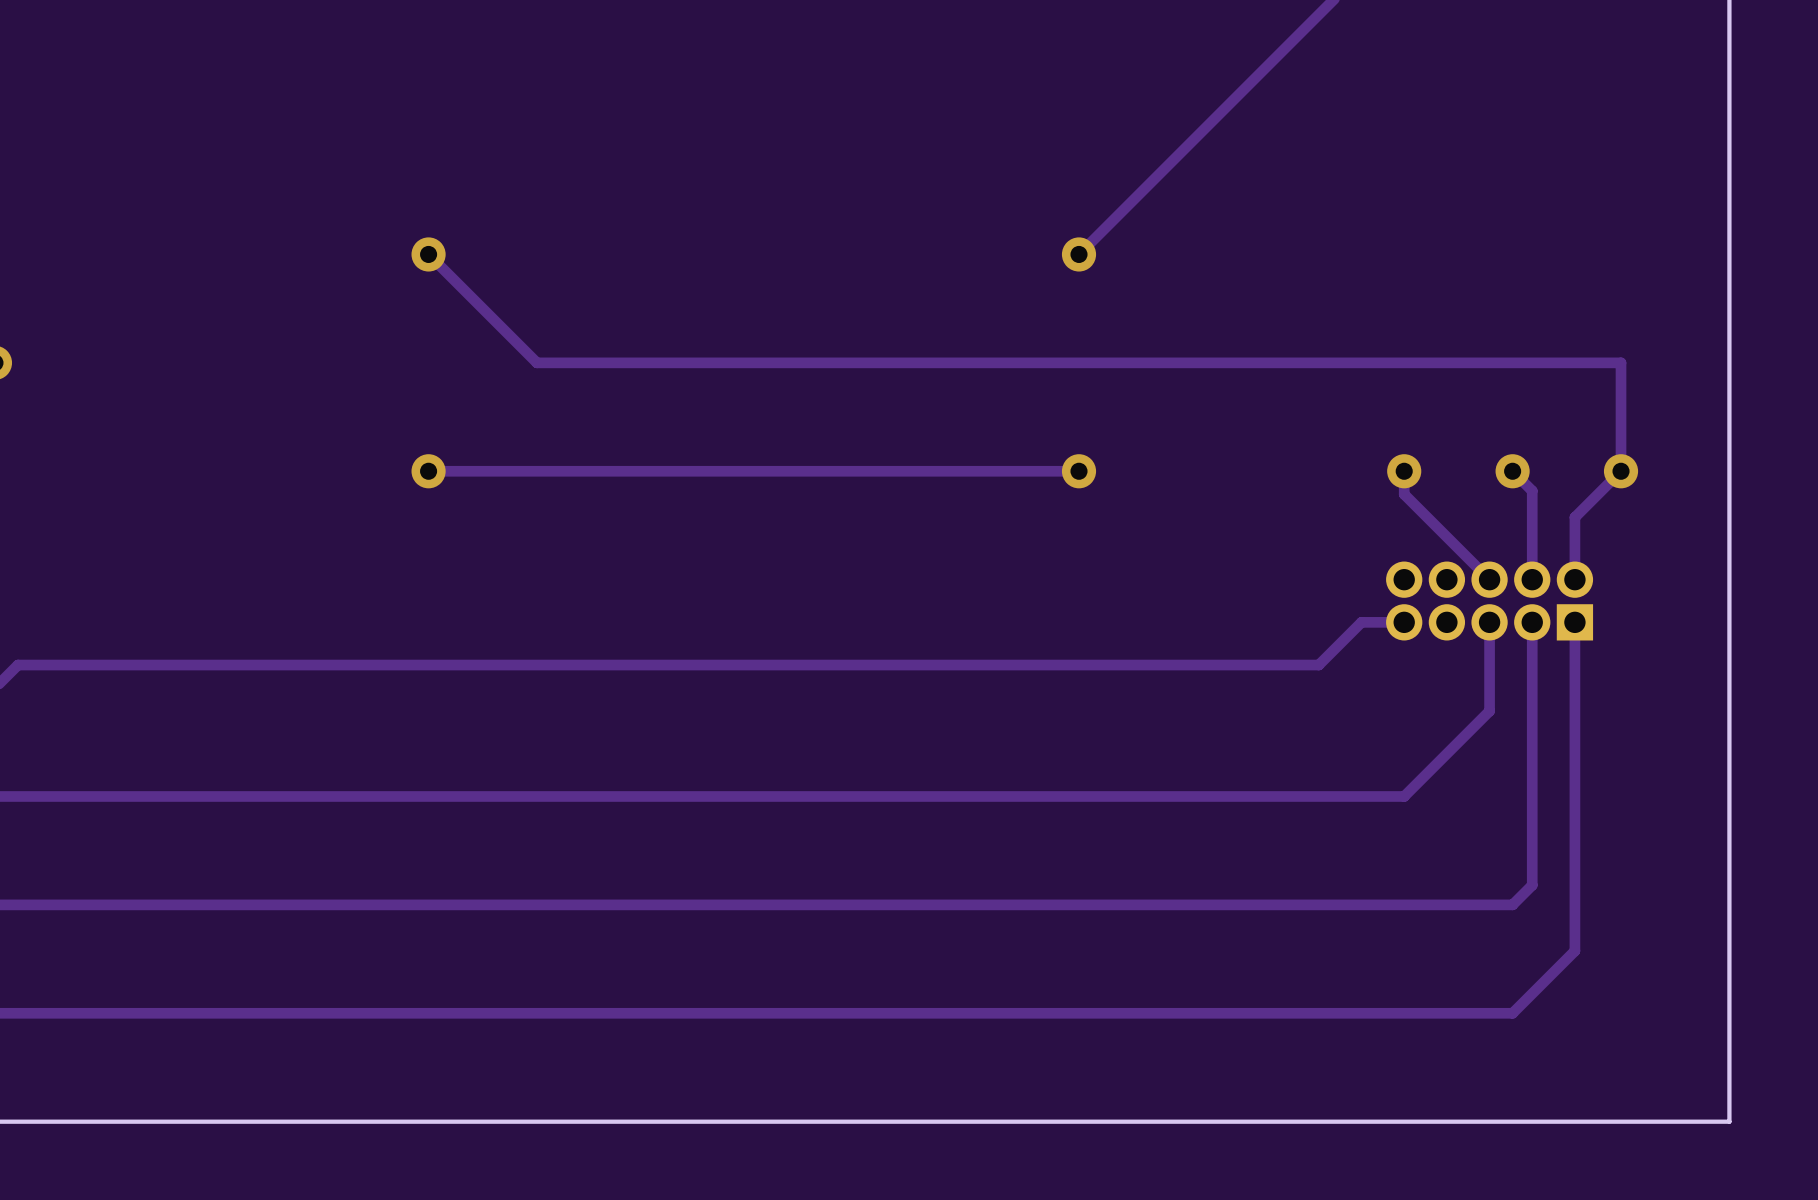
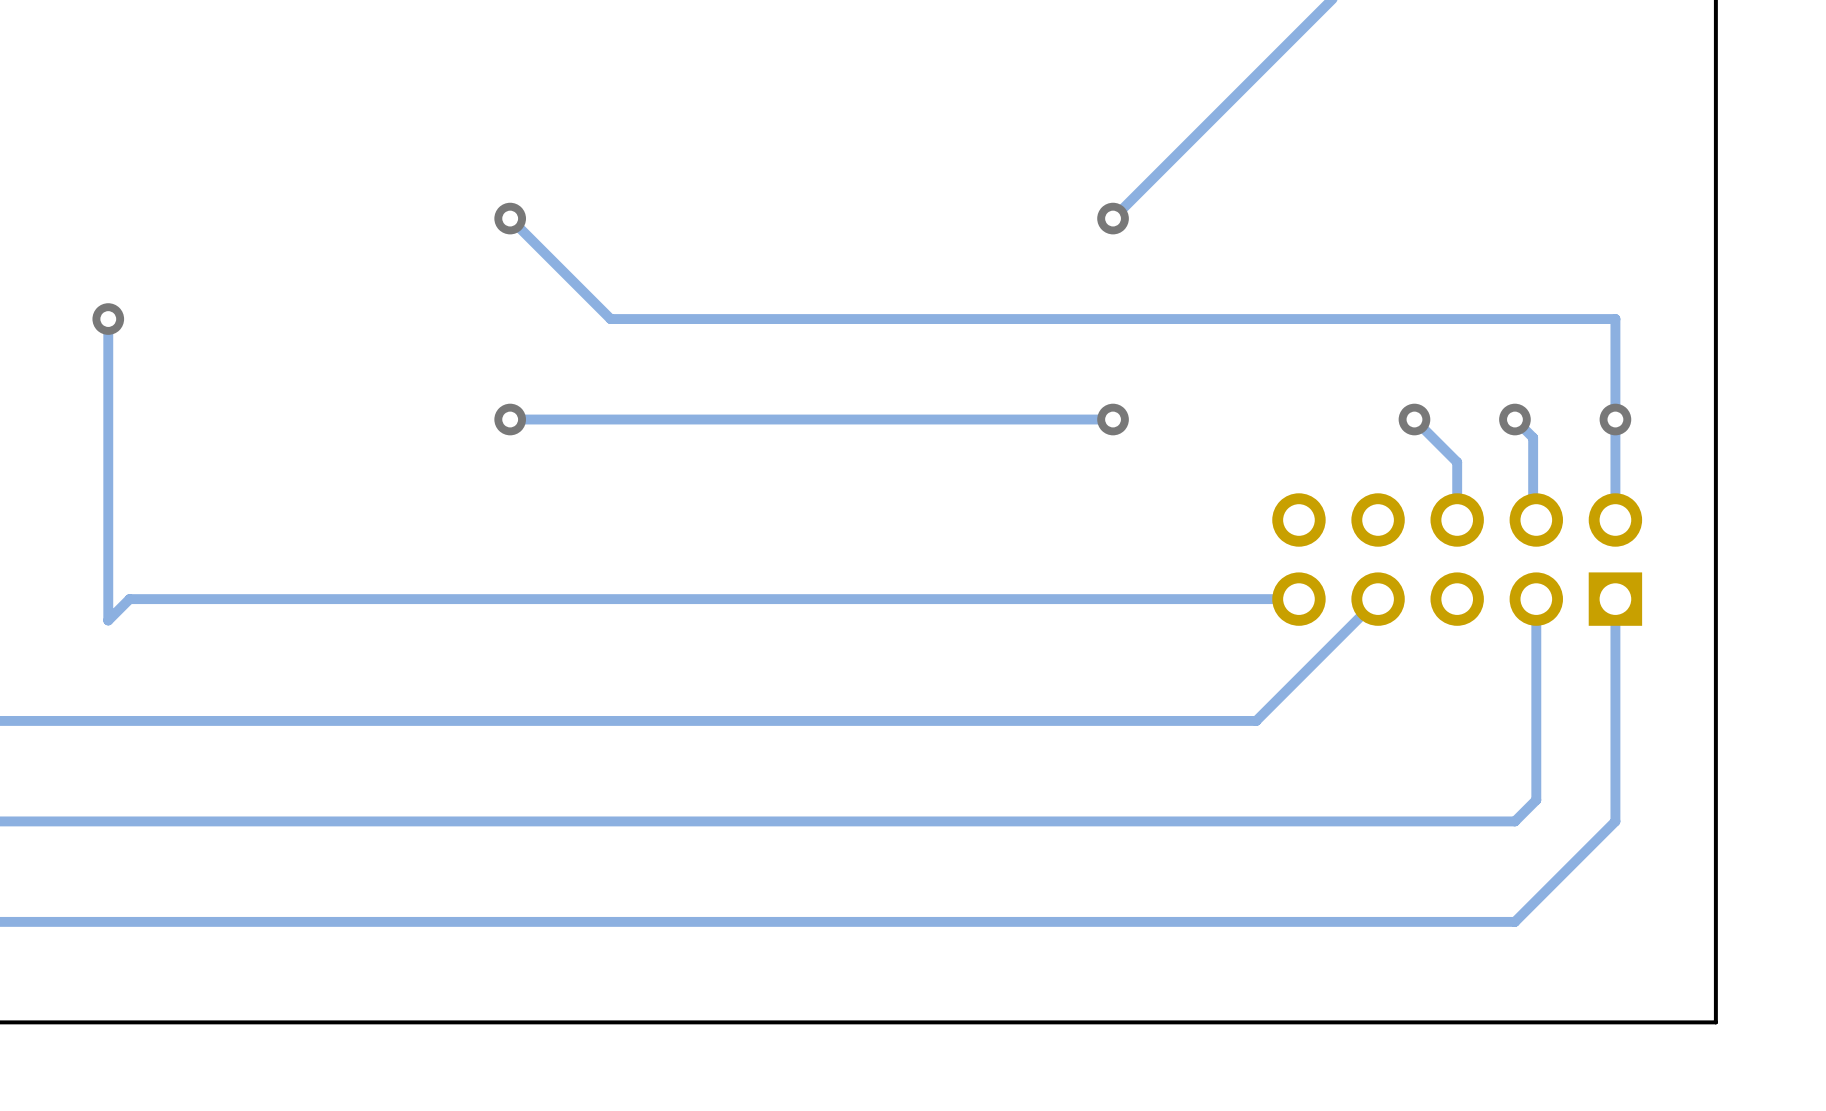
track: (1404, 471) (1404, 494) (1489, 579) -> (1414, 419) (1457, 462) (1457, 519)
track: (1621, 471) (1574, 517) (1574, 579) -> (1615, 419) (1615, 519)
part: (1489, 601) -> none
track: (1404, 622) (1361, 622) (1318, 665) (1279, 665) -> none
part: none -> (1457, 559)
track: (1489, 622) (1489, 711) (1404, 796) (1233, 796) -> (1378, 599) (1256, 720)
track: (1532, 622) (1532, 885) -> (1536, 599) (1536, 800) (1533, 803)
track: (1574, 622) (1574, 950) -> (1615, 599) (1615, 821) (1572, 864)

